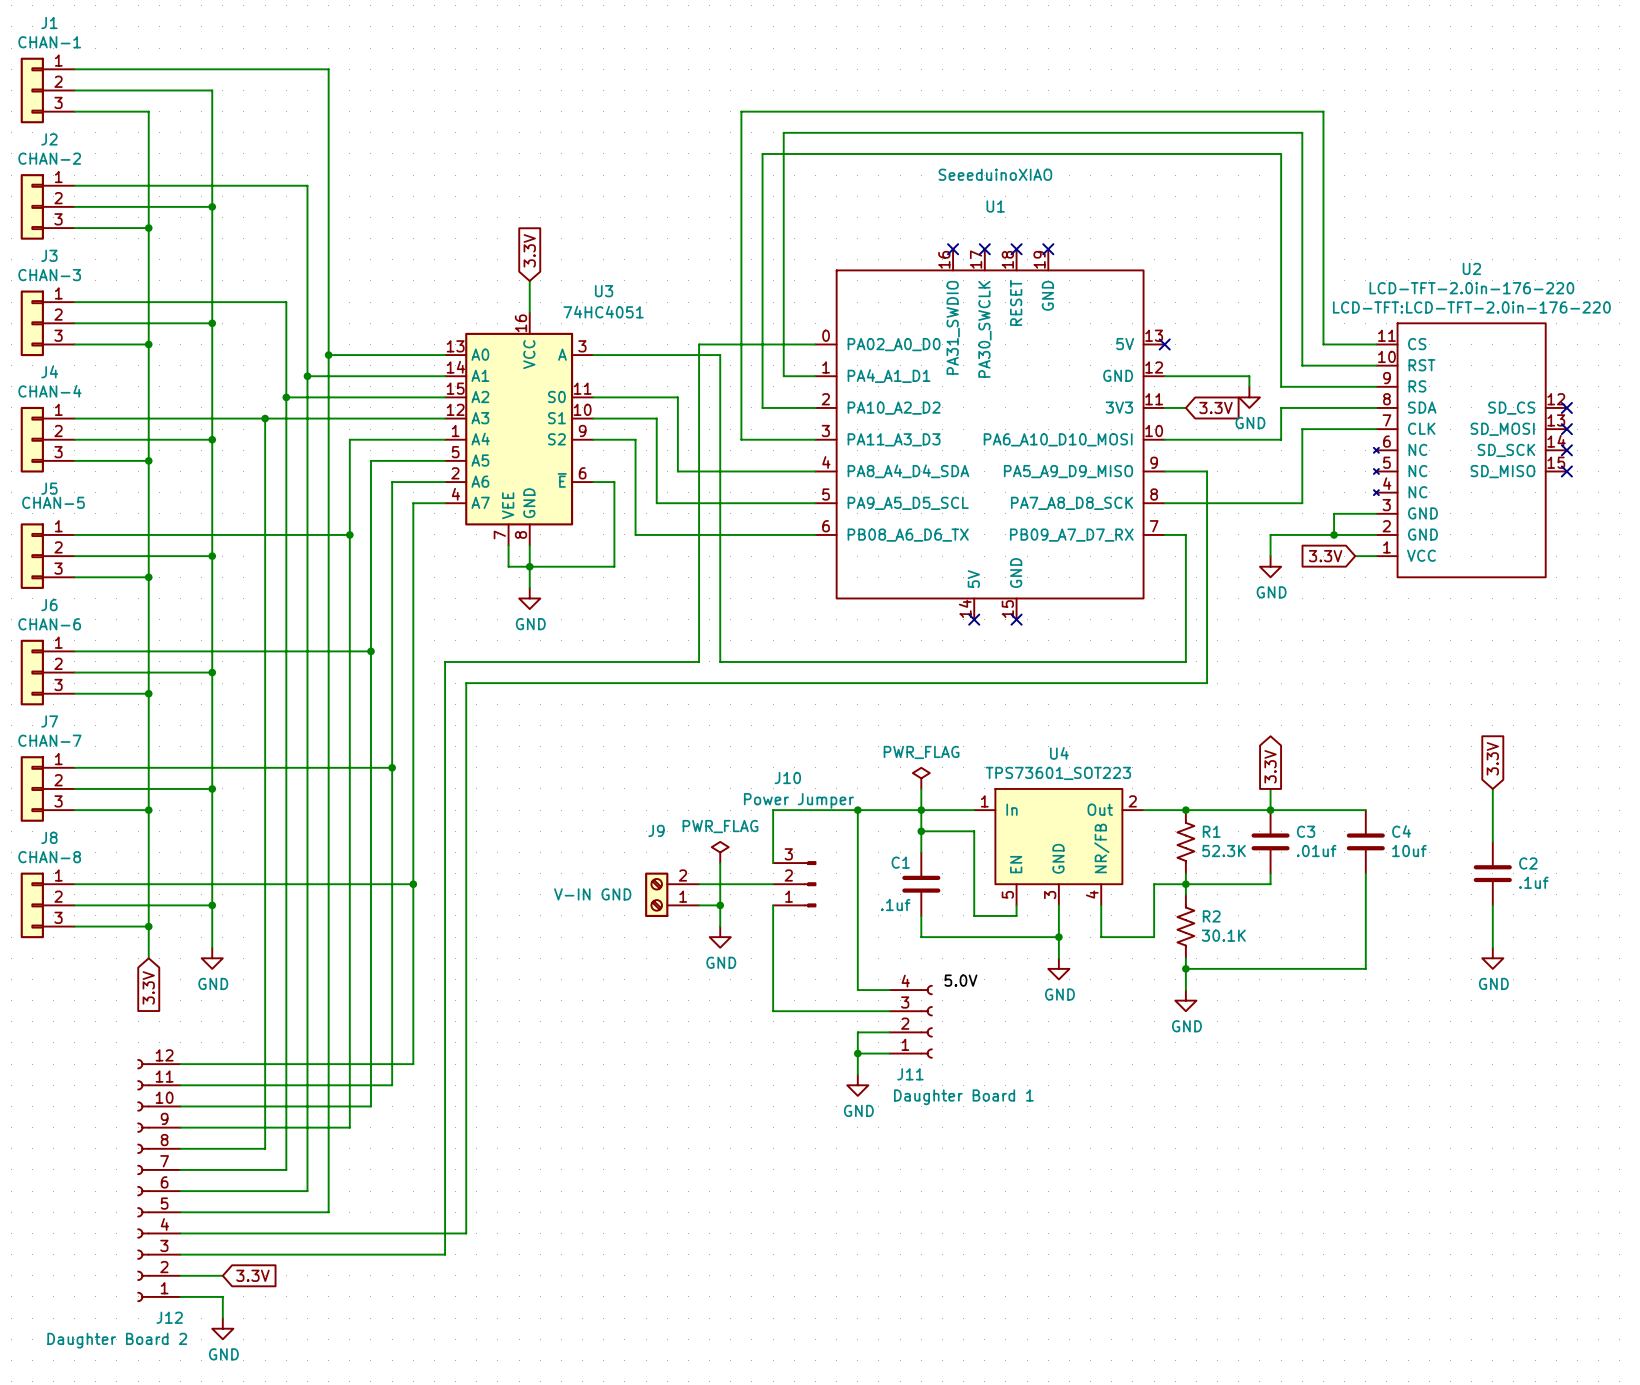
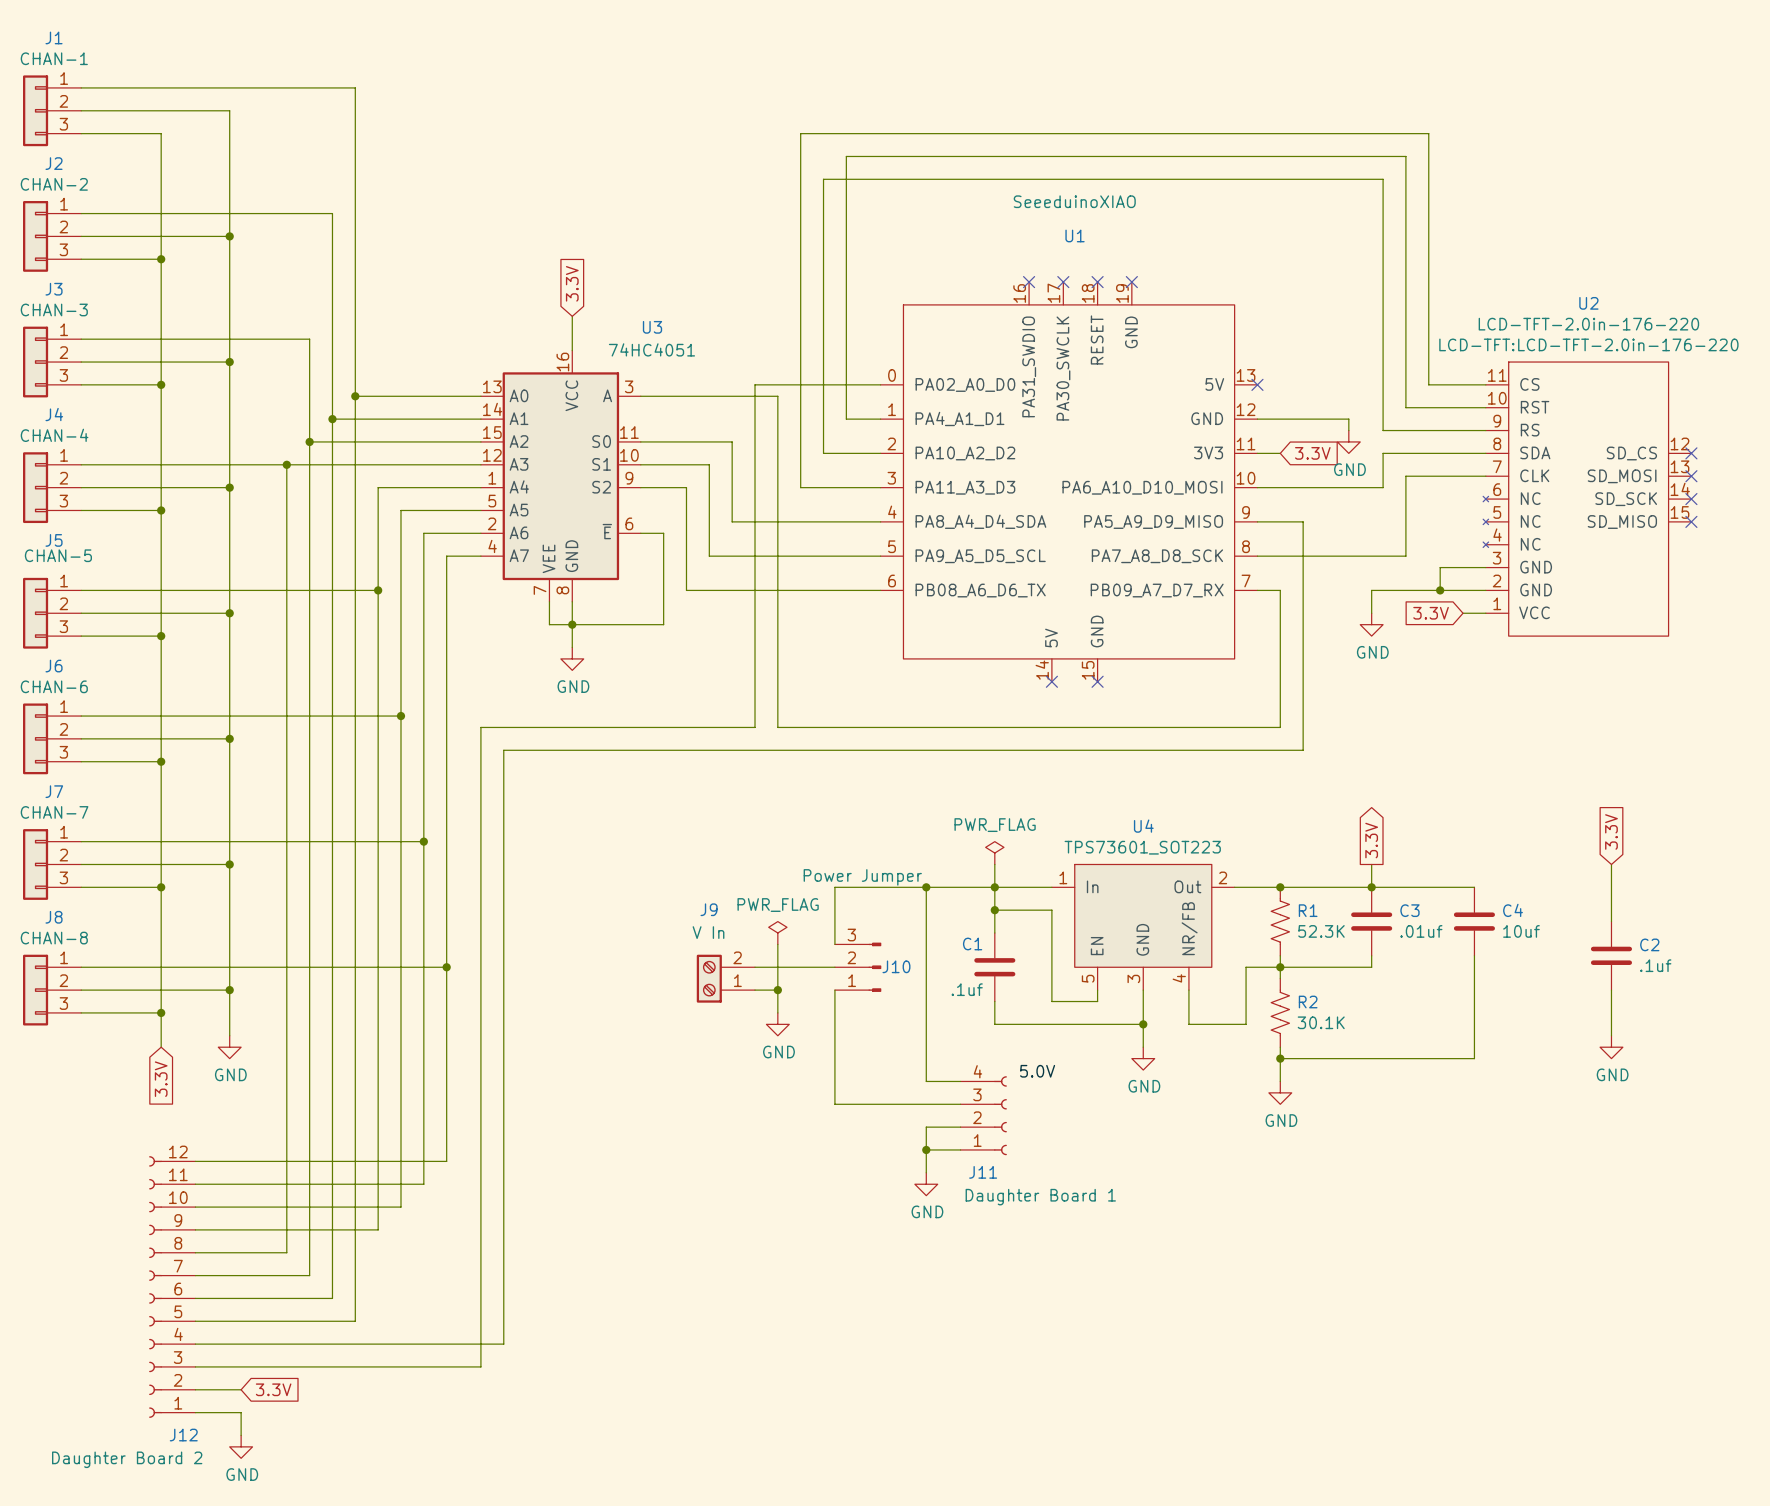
J10 name position: J10 (787, 777) -> J10 (896, 966)
J9 value: V-IN GND (592, 894) -> V In (708, 932)

